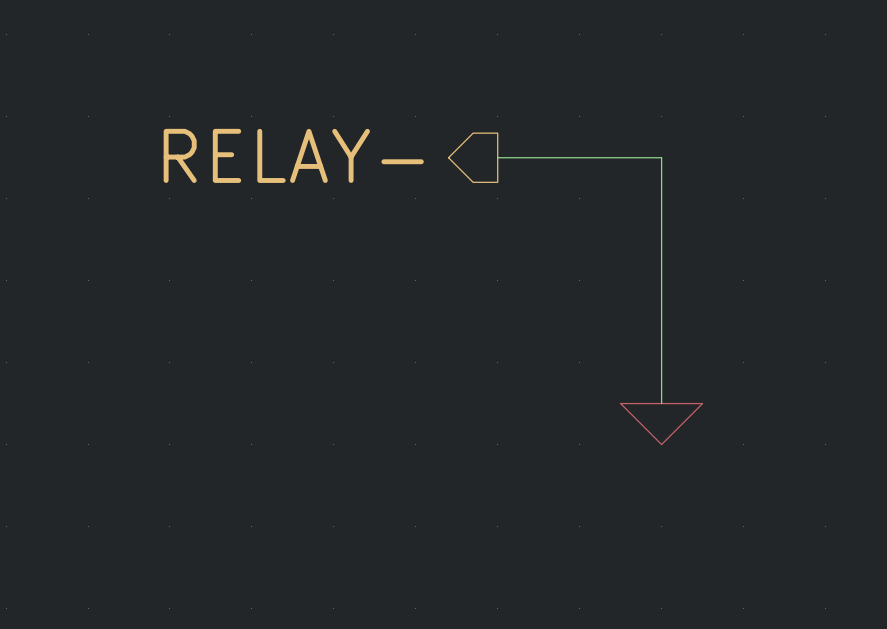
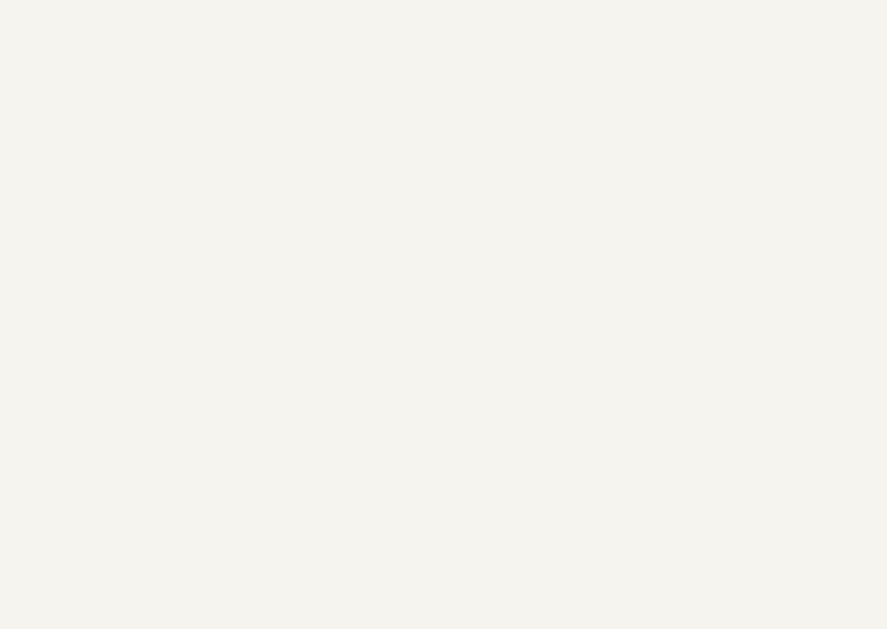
hierarchical label: RELAY- (293, 155) -> none
wire: (497, 157) (661, 157) (661, 403) -> none
power symbol: (661, 424) -> none

